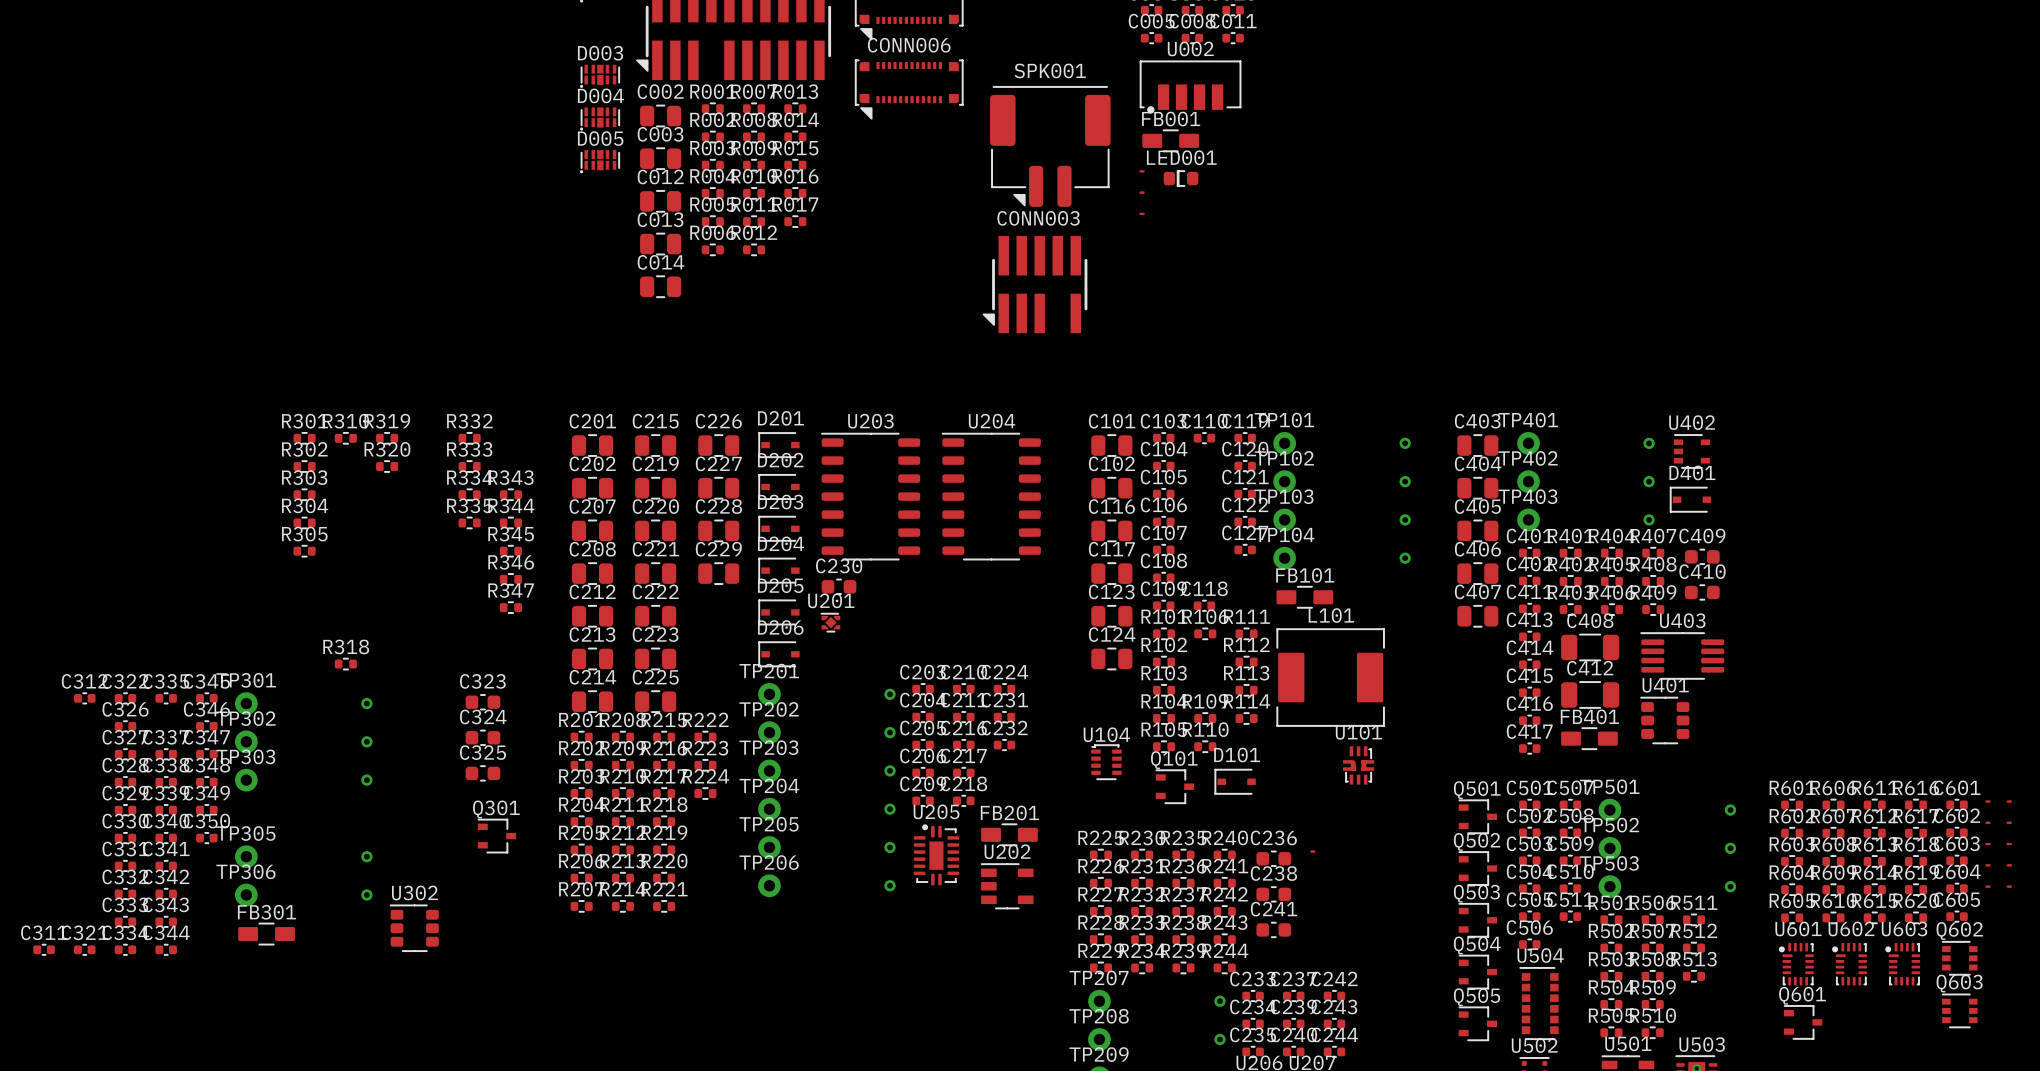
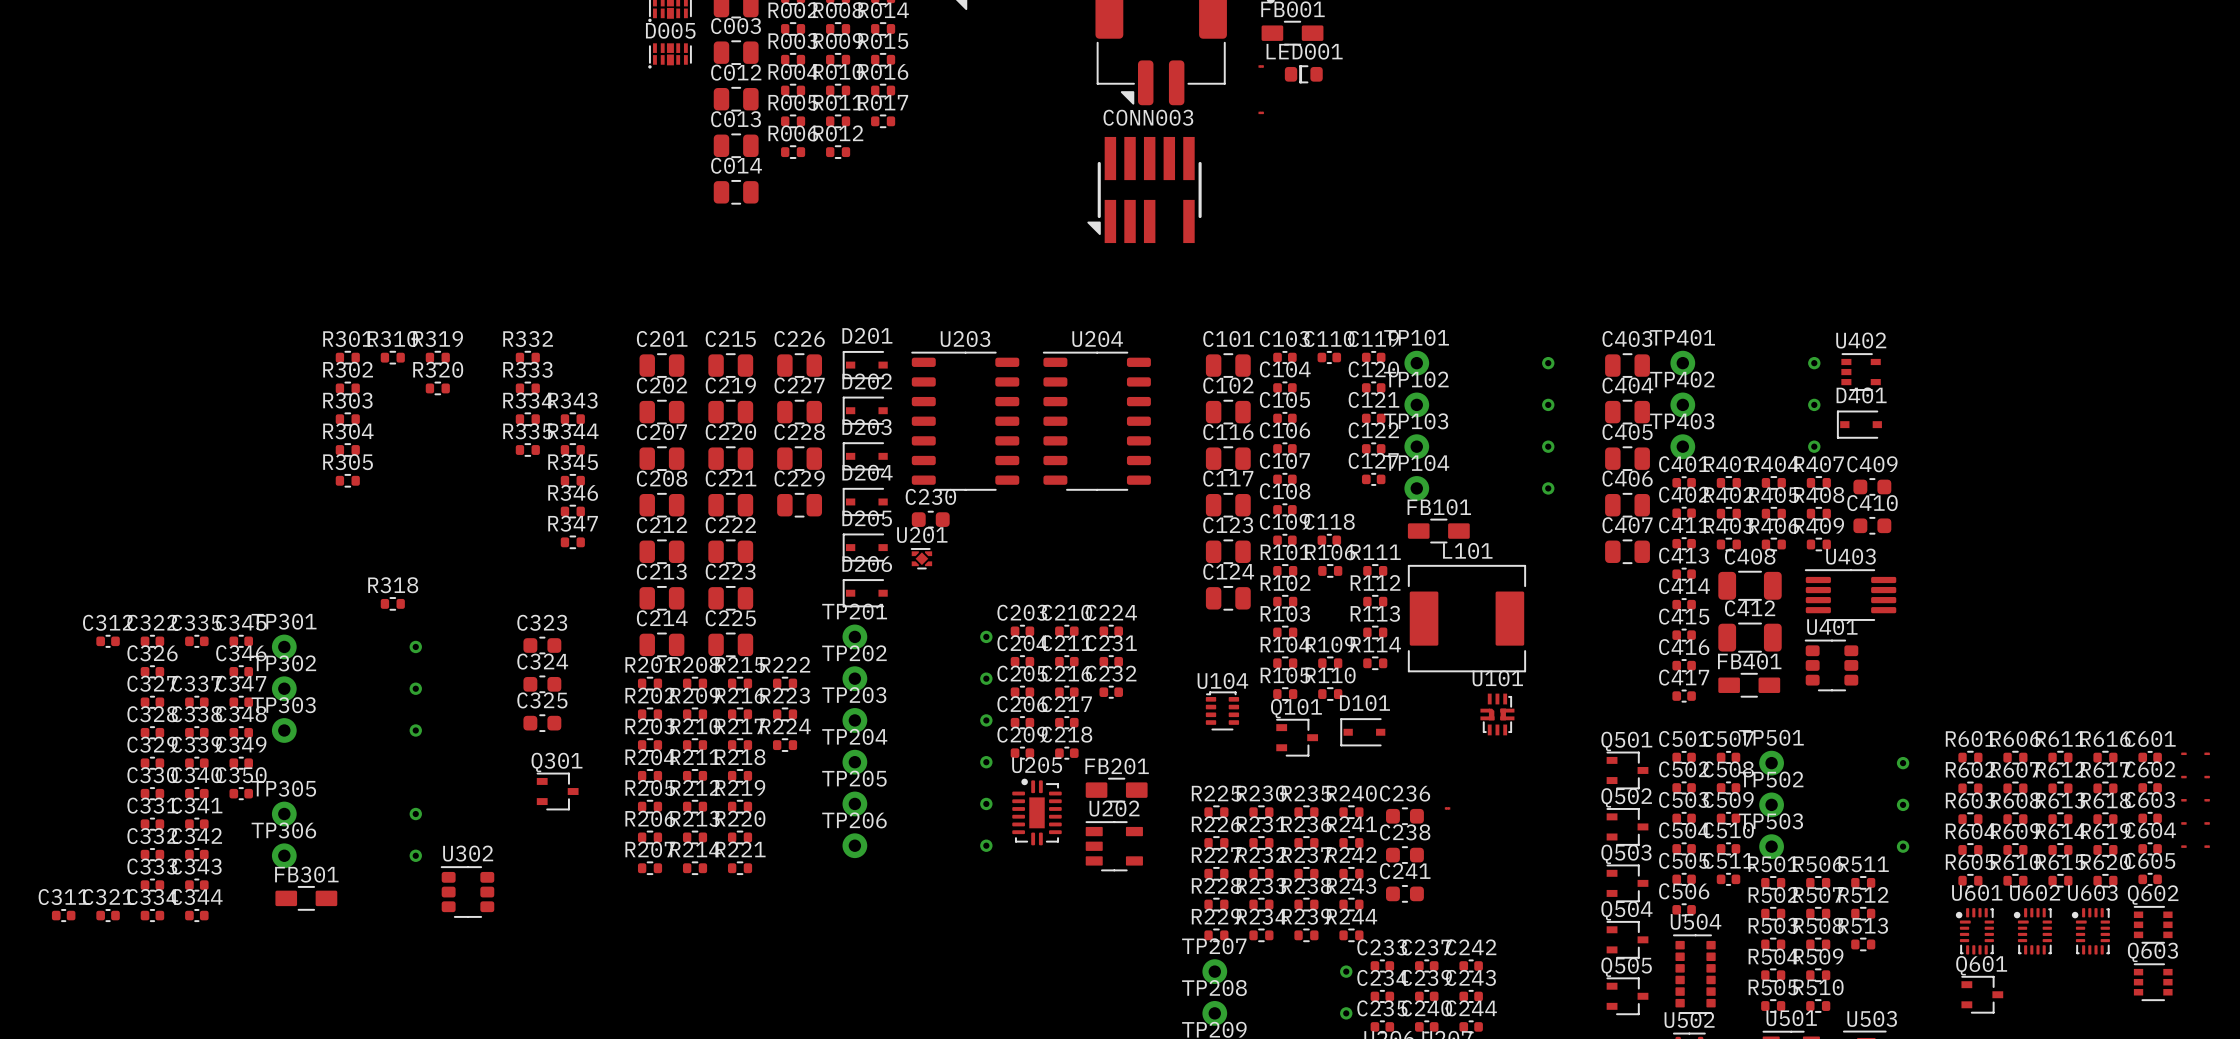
part: (1141, 192) -> none

